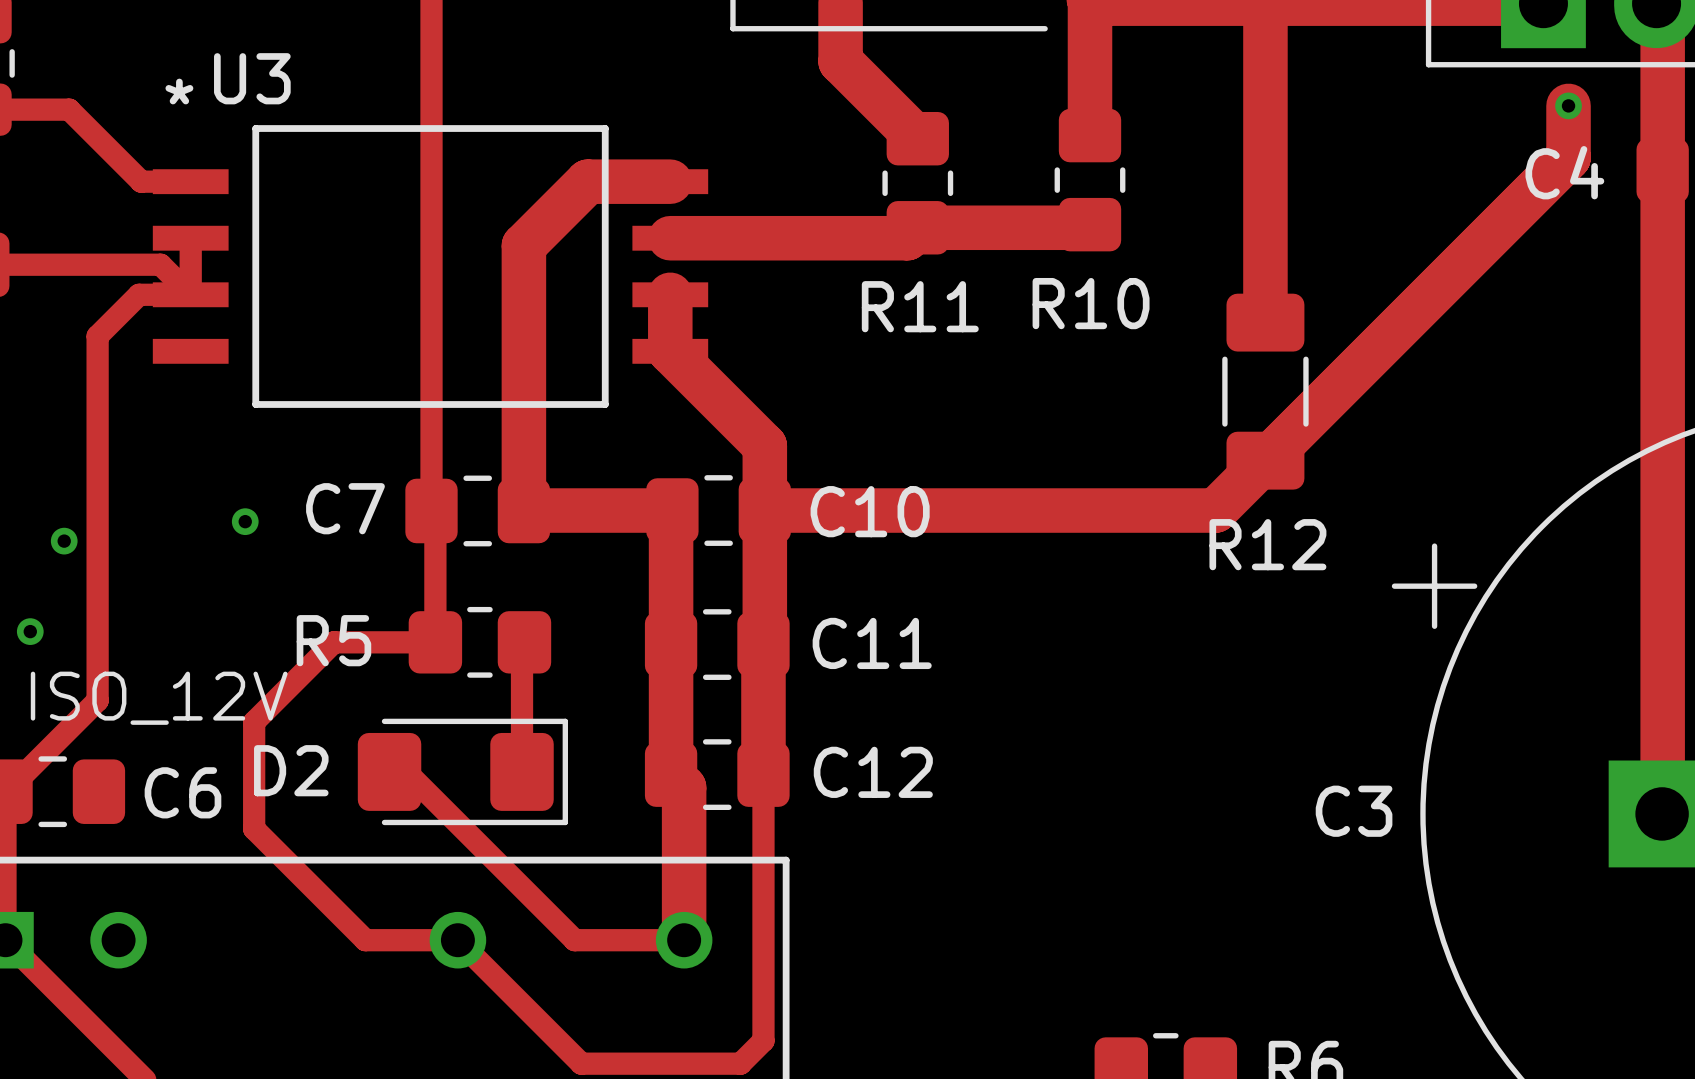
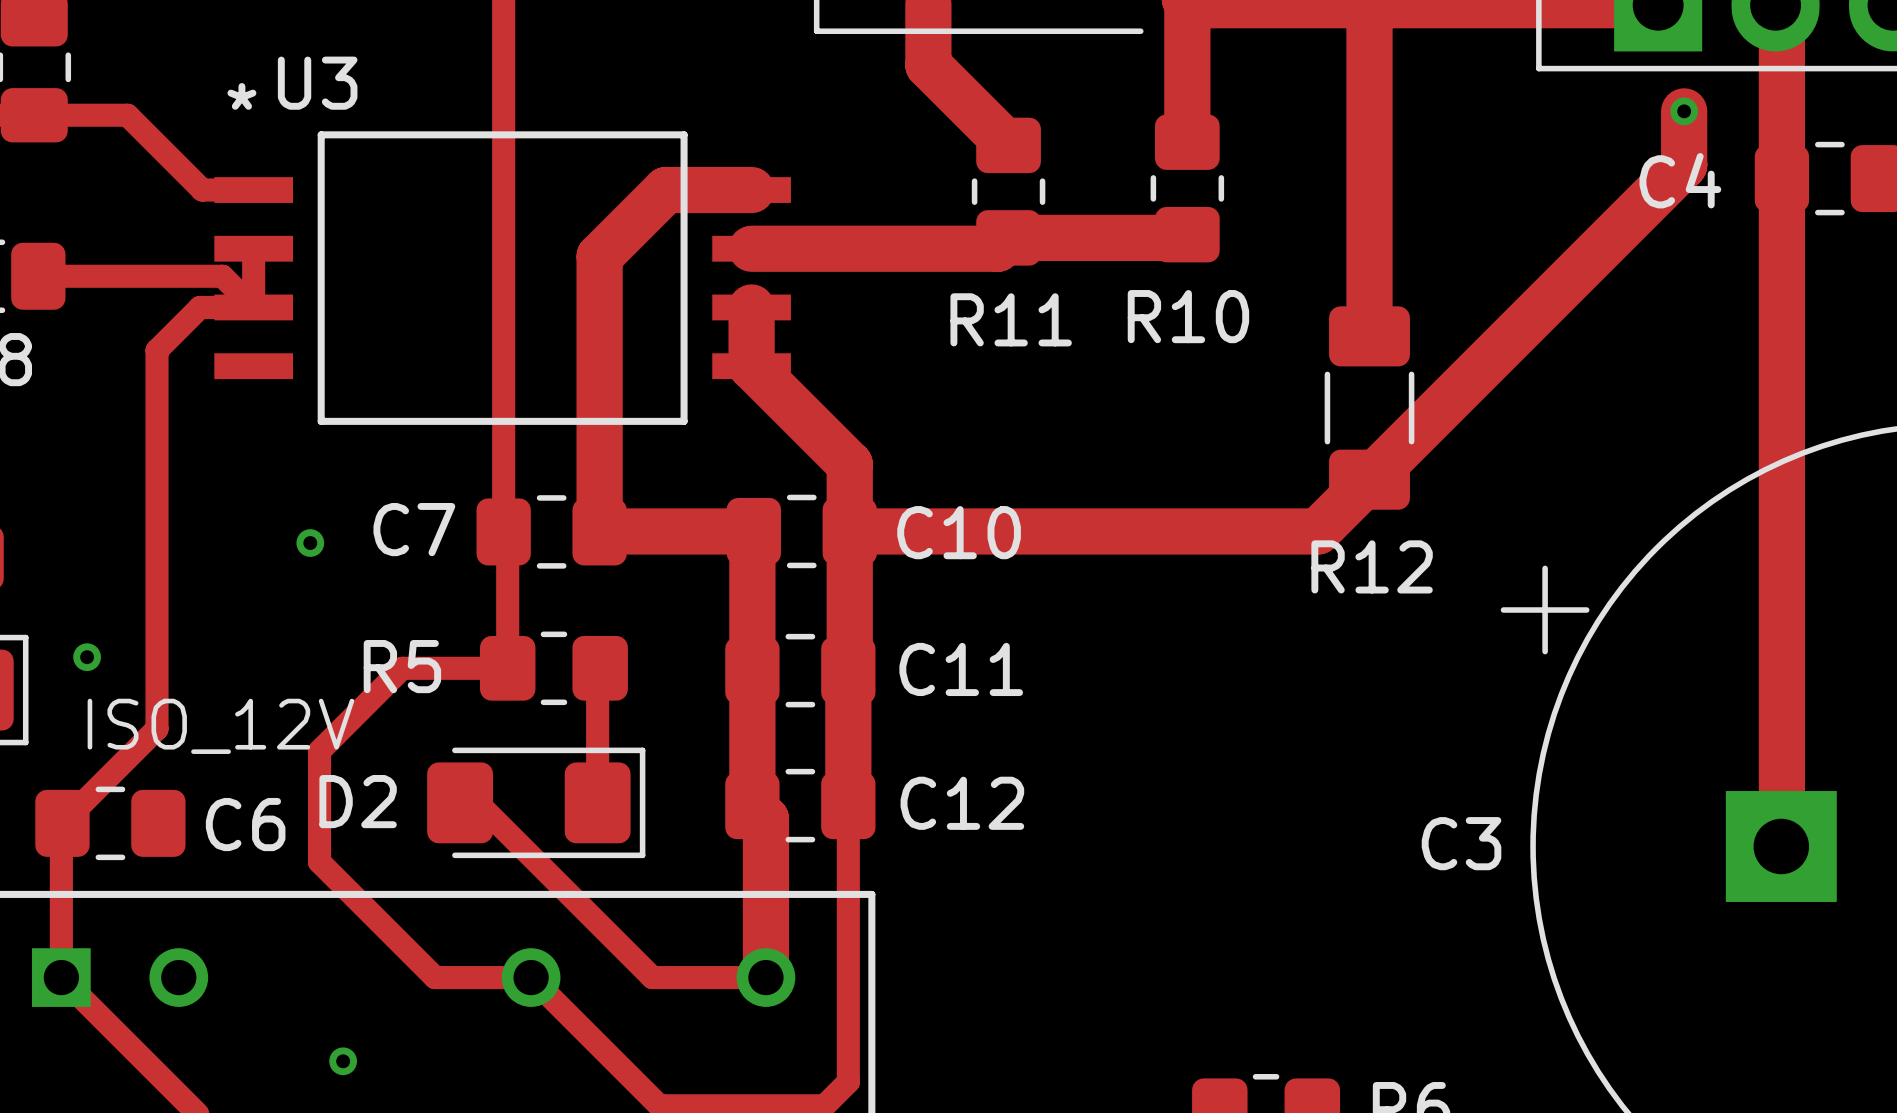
via: (64, 541) -> none
via: none -> (343, 1061)

